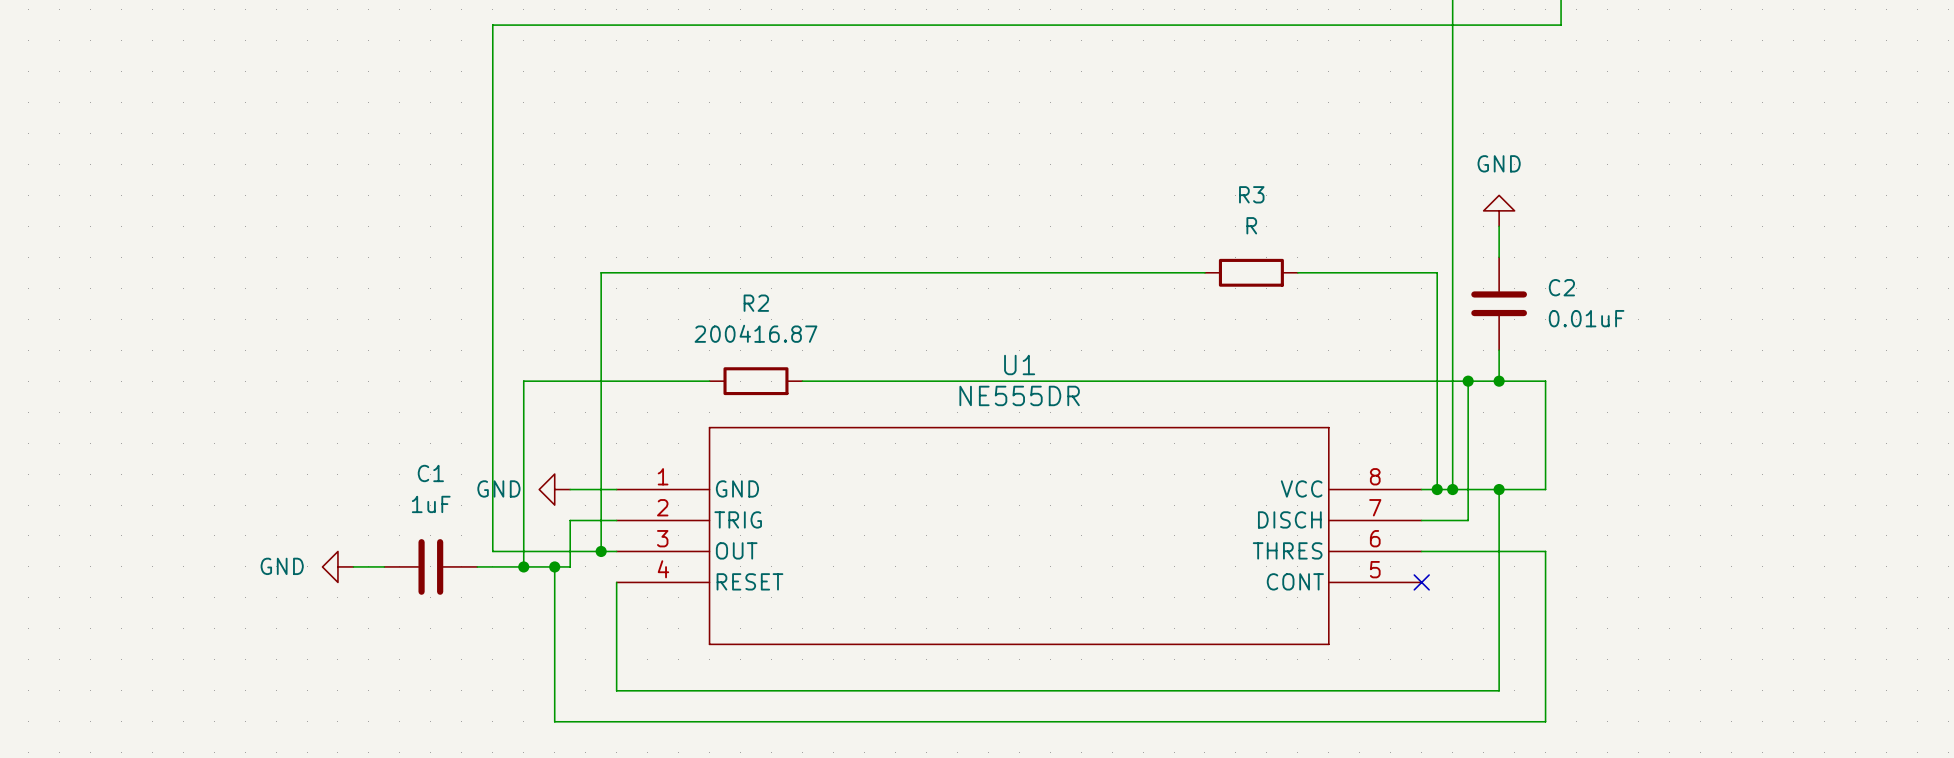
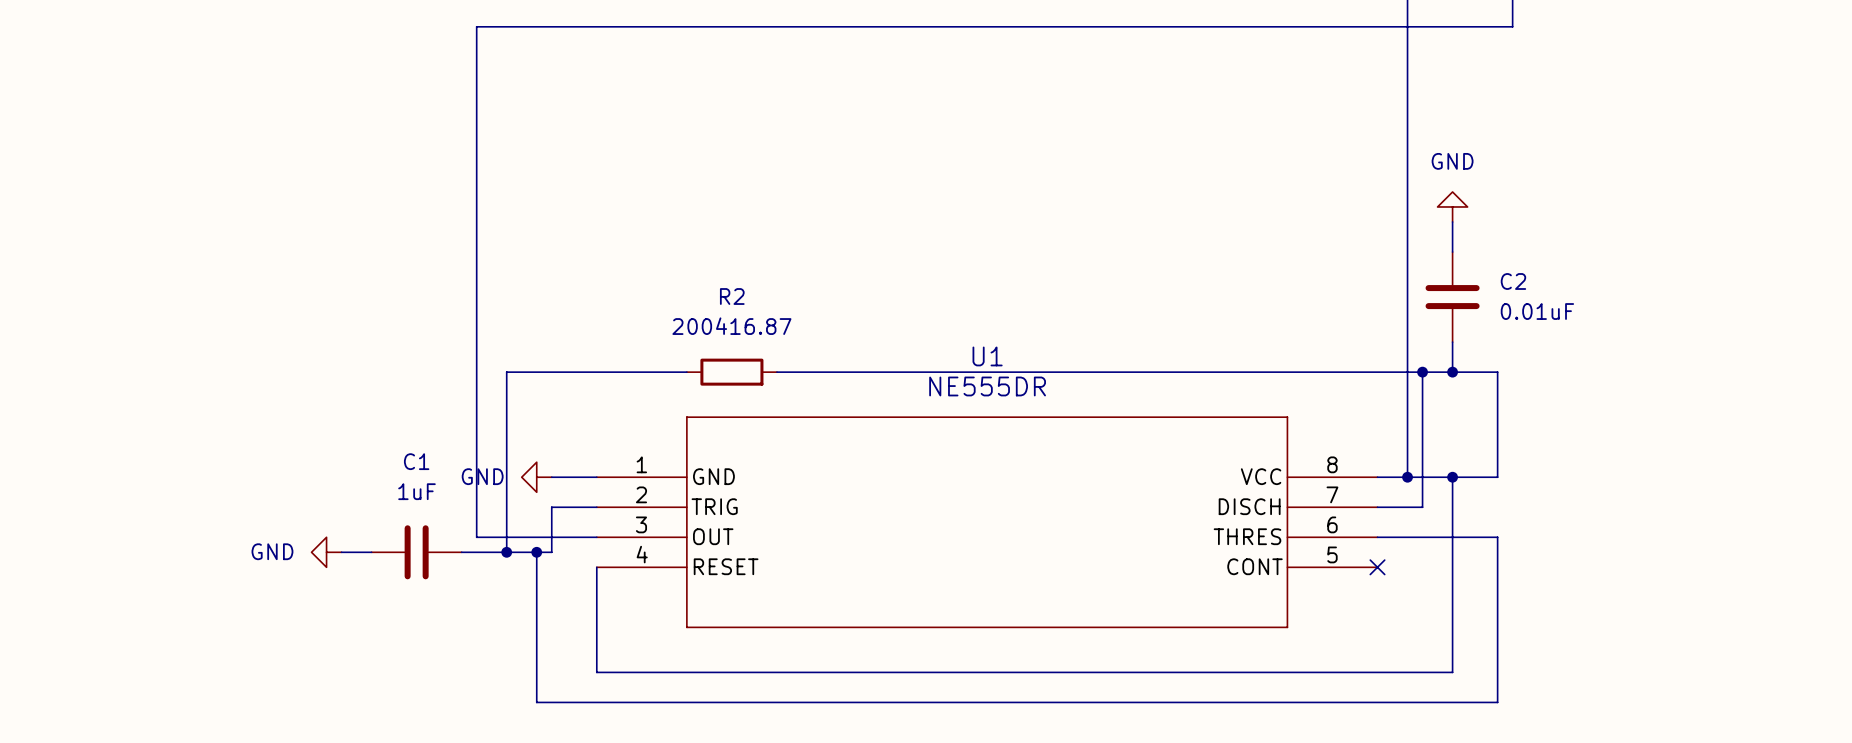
wire: (1204, 272) (601, 272) (601, 551) -> none
R3: R (1251, 272) -> none
wire: (1297, 272) (1437, 272) (1437, 489) -> none
junction: (1437, 489) -> none
junction: (601, 551) -> none

